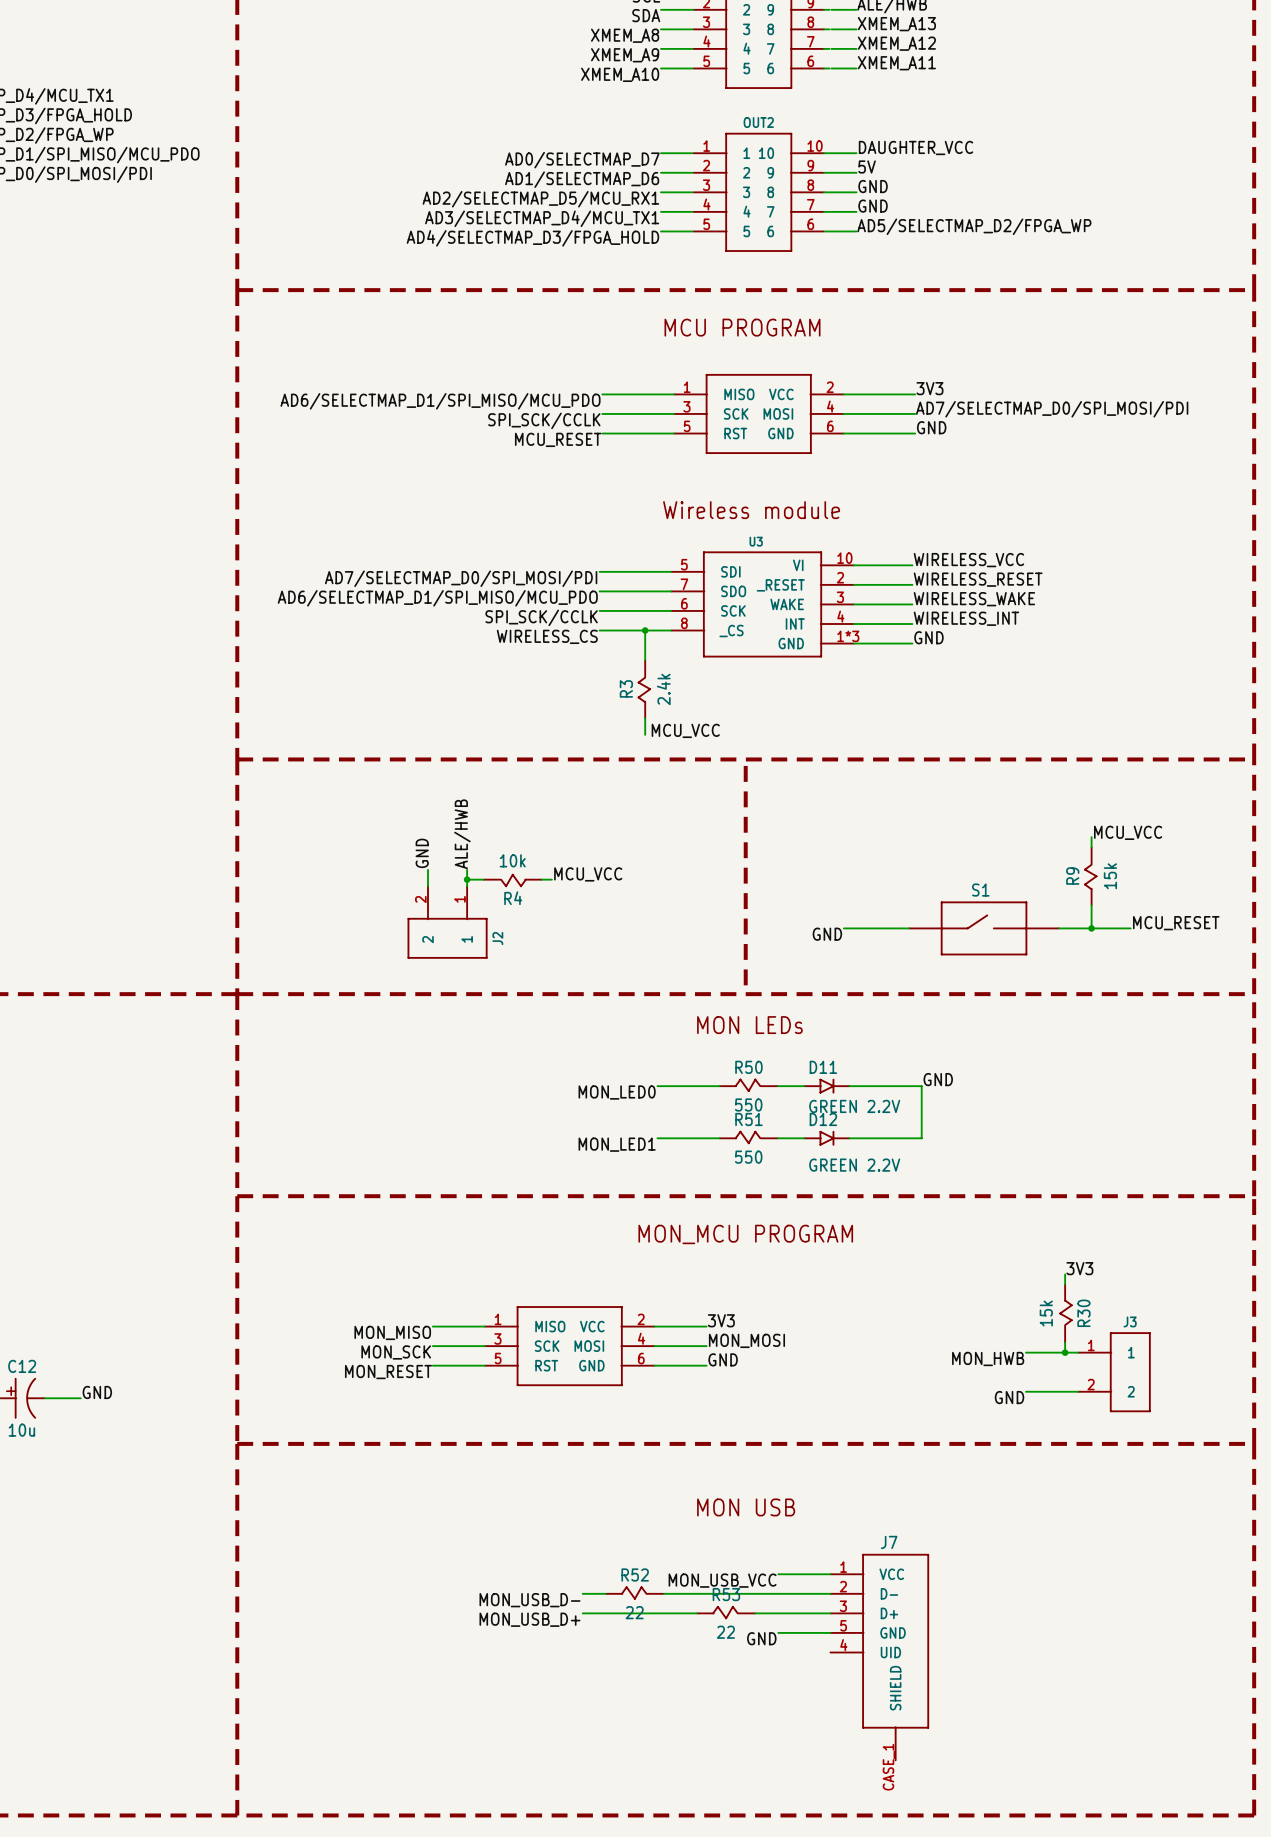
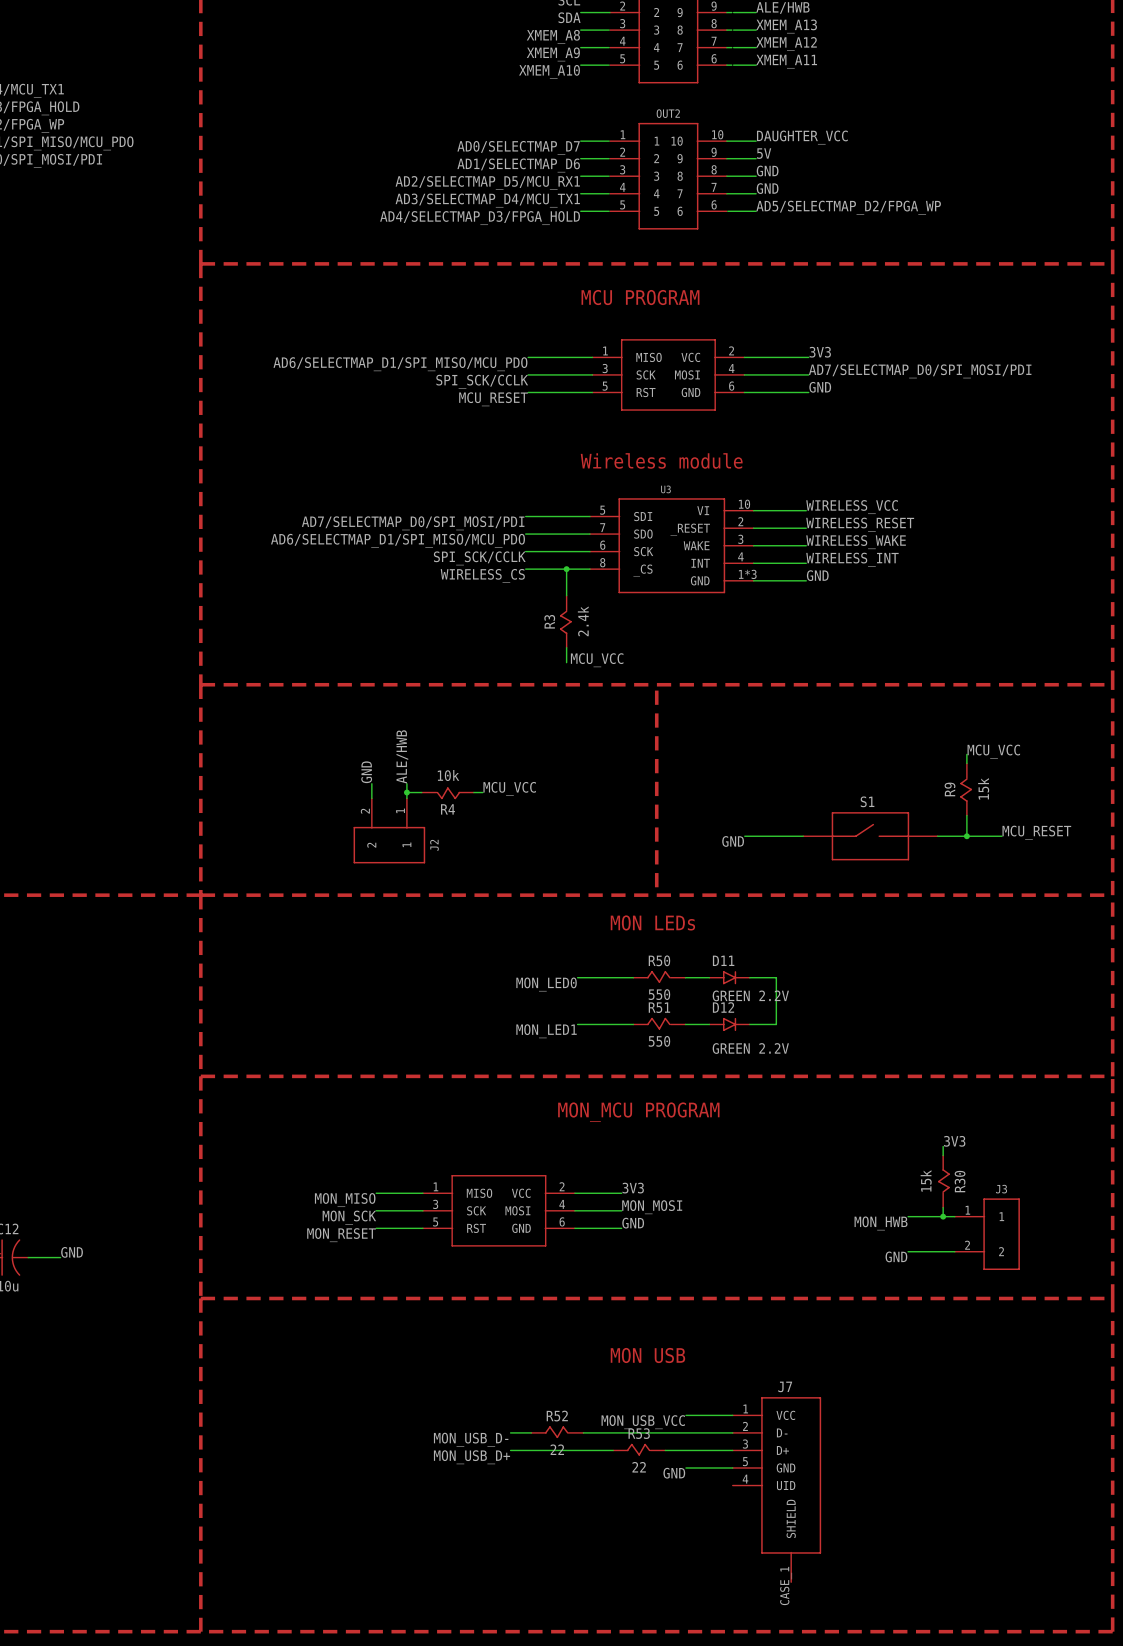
label: GND (938, 1079) -> none
wire: (879, 1086) (921, 1086) (921, 1138) (879, 1138) -> (776, 977) (776, 1024)

